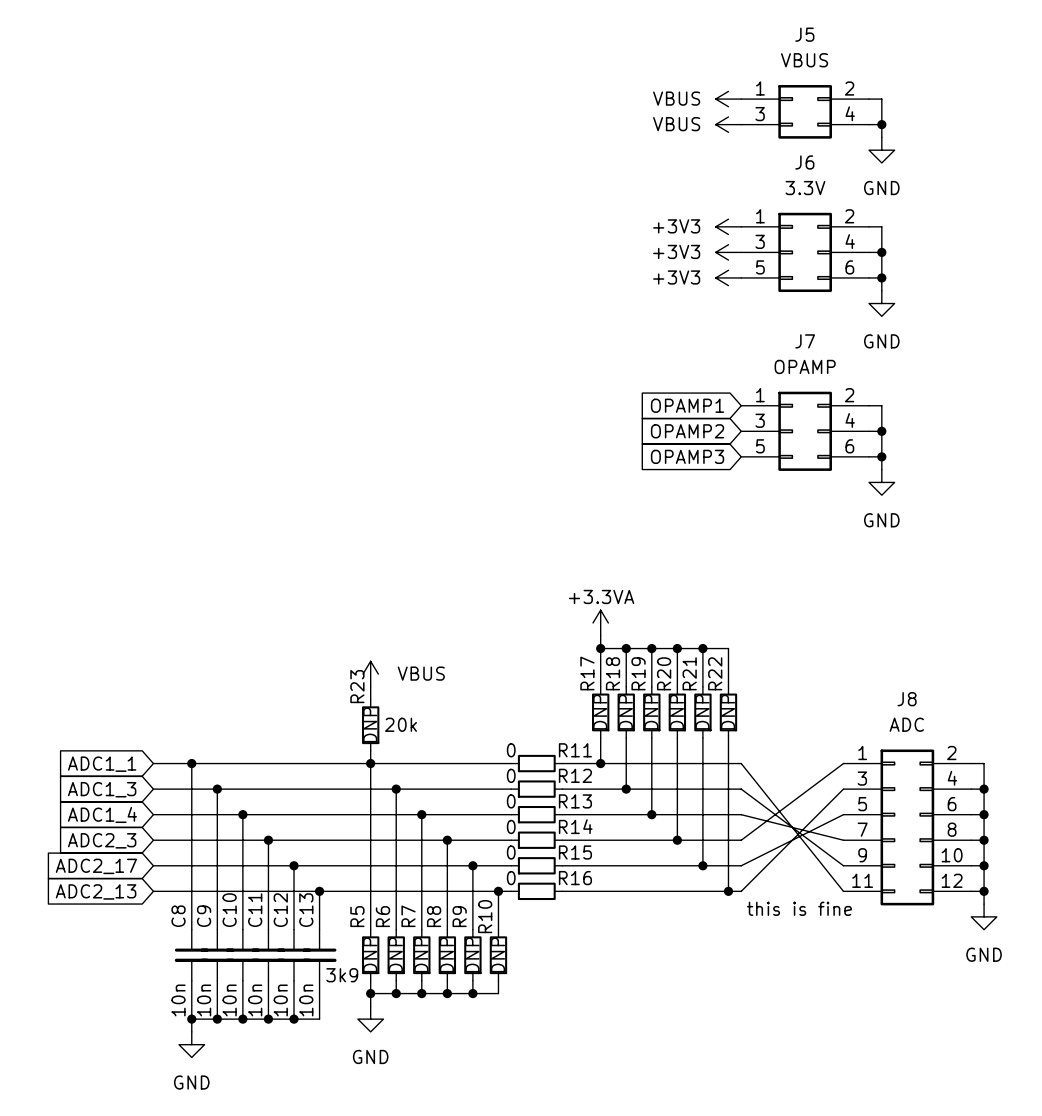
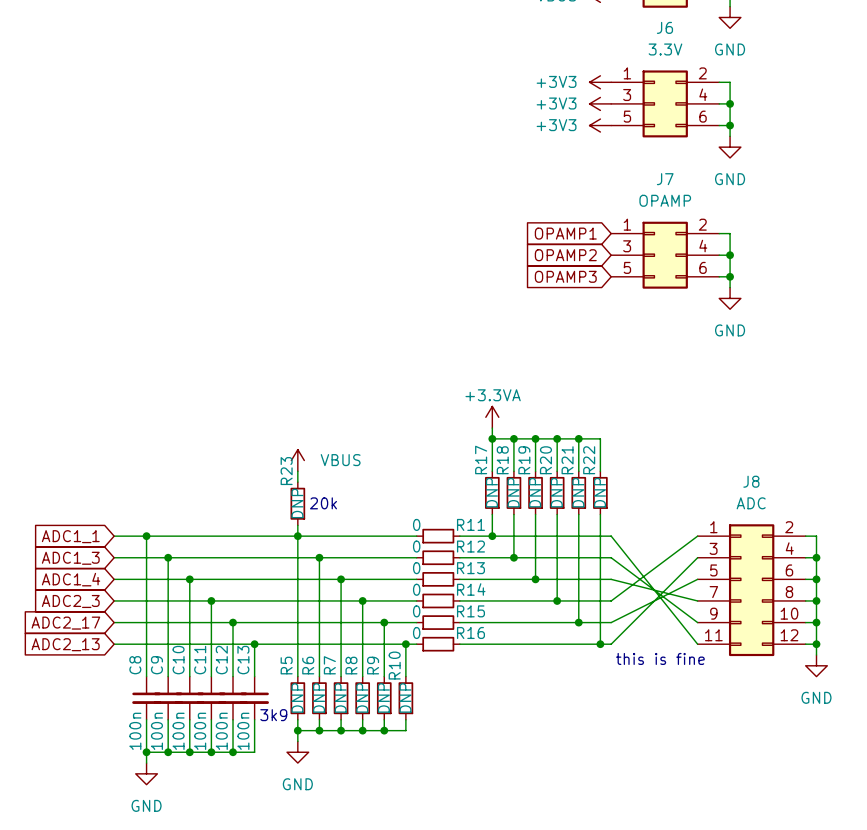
C8 value: 10n (178, 1000) -> 100n (135, 731)
C9 value: 10n (204, 1000) -> 100n (156, 731)
C10 value: 10n (229, 1000) -> 100n (178, 731)
C11 value: 10n (255, 1000) -> 100n (200, 731)
C12 value: 10n (280, 1000) -> 100n (221, 731)
C13 value: 10n (306, 1000) -> 100n (243, 731)

